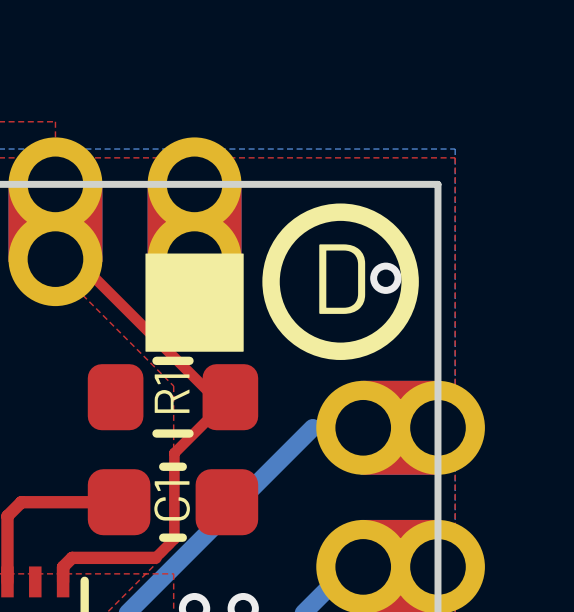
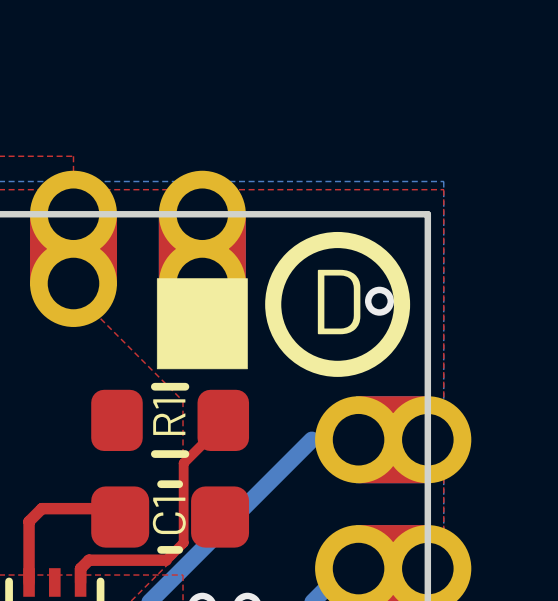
top track: (89, 272) (214, 397) -> none
R1 position: (172, 397) -> (170, 420)
C1 position: (172, 502) -> (170, 517)

